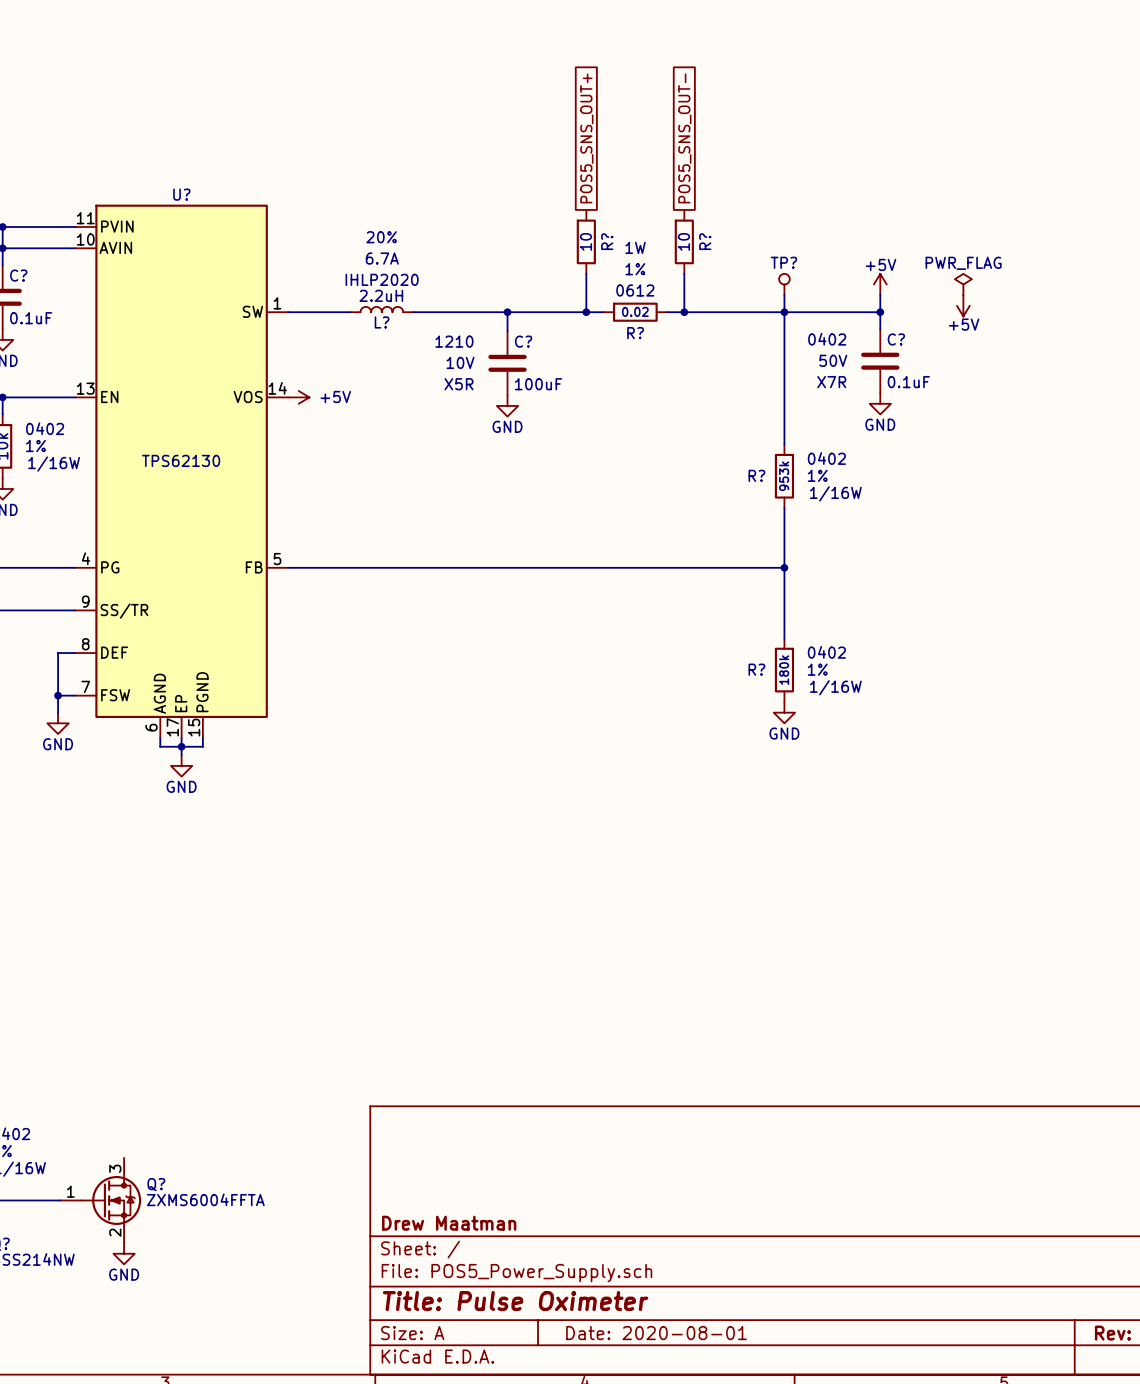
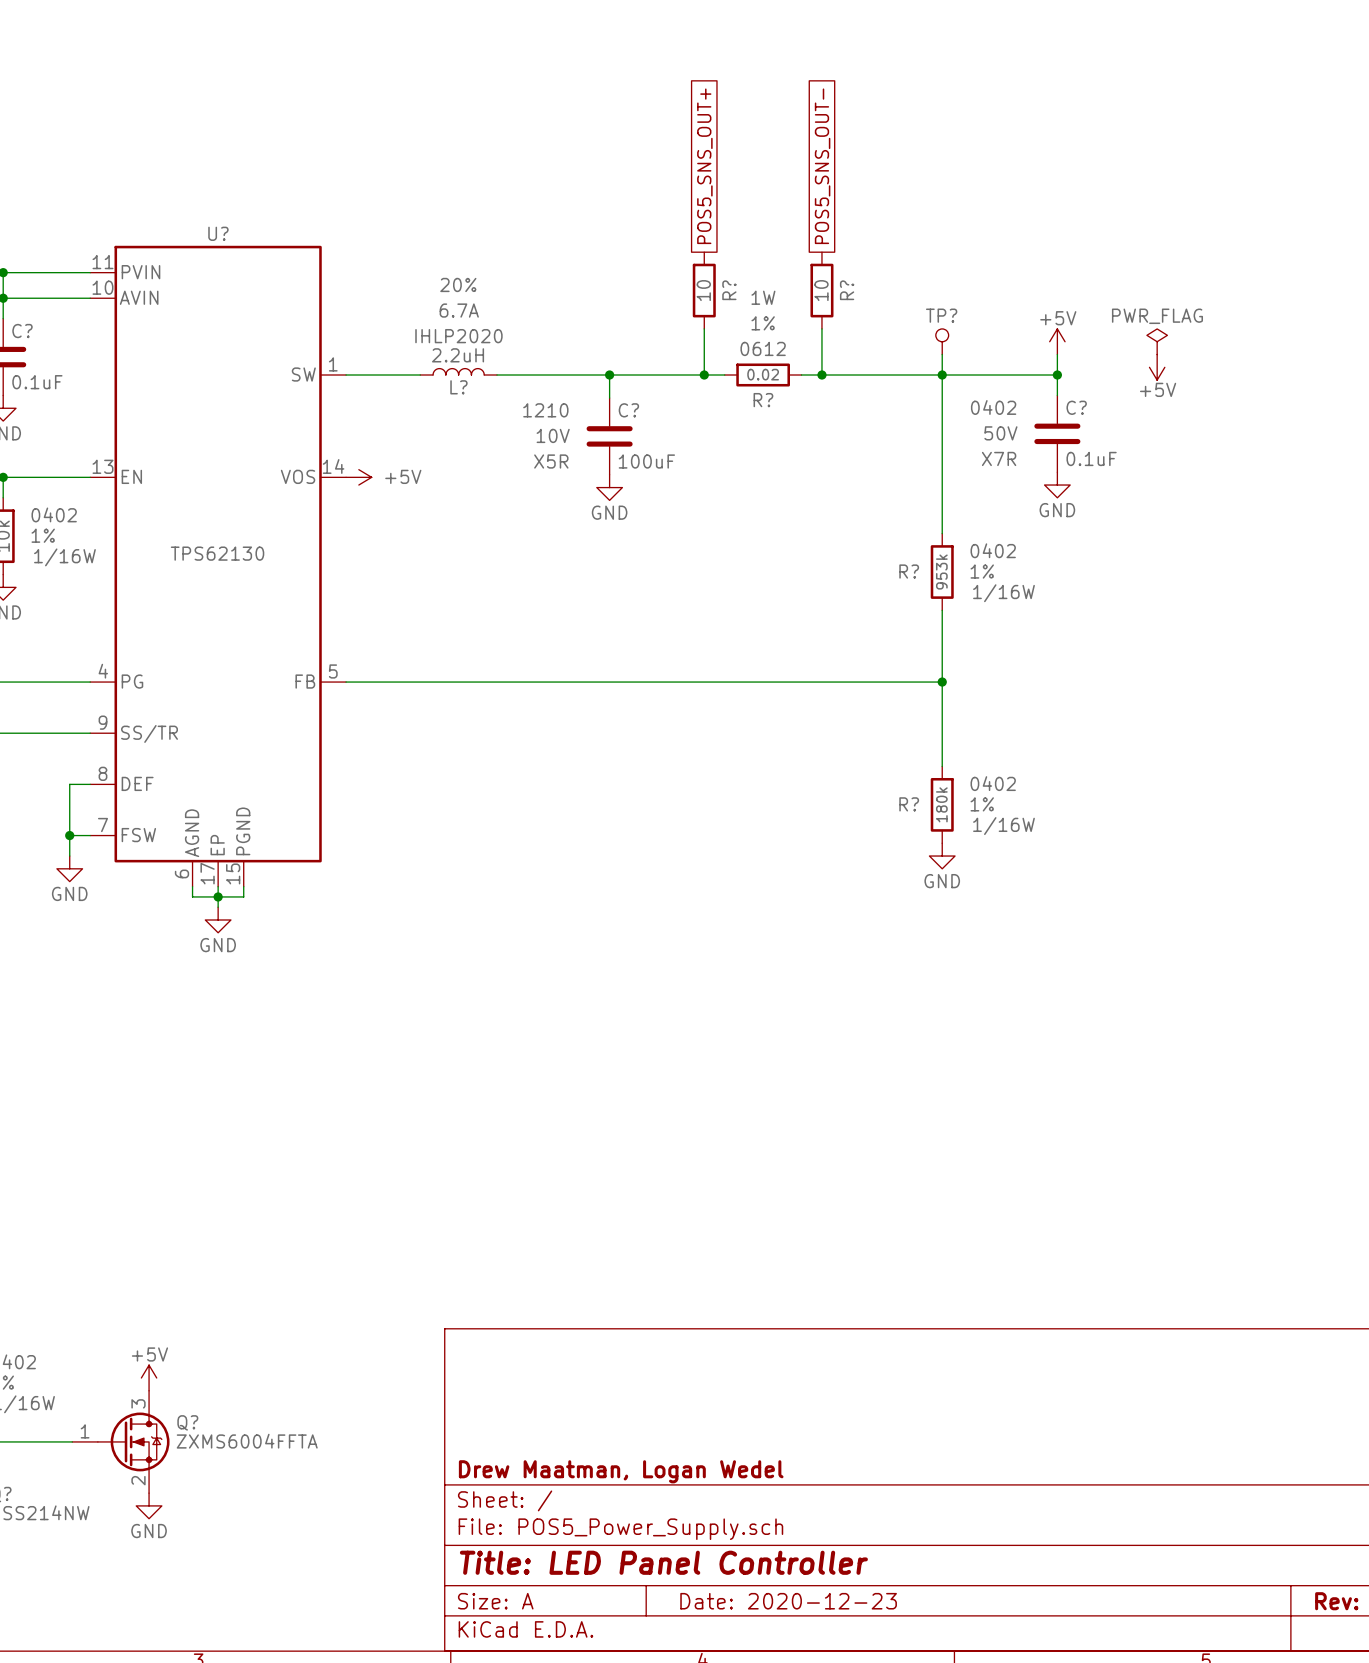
power symbol: none -> +5V (149, 1377)
title block: Drew Maatman (449, 1223) -> Drew Maatman, Logan Wedel (621, 1471)
title block: Title: Pulse Oximeter (515, 1301) -> Title: LED Panel Controller (663, 1562)
title block: Date: 2020-08-01 (656, 1333) -> Date: 2020-12-23 (788, 1601)

